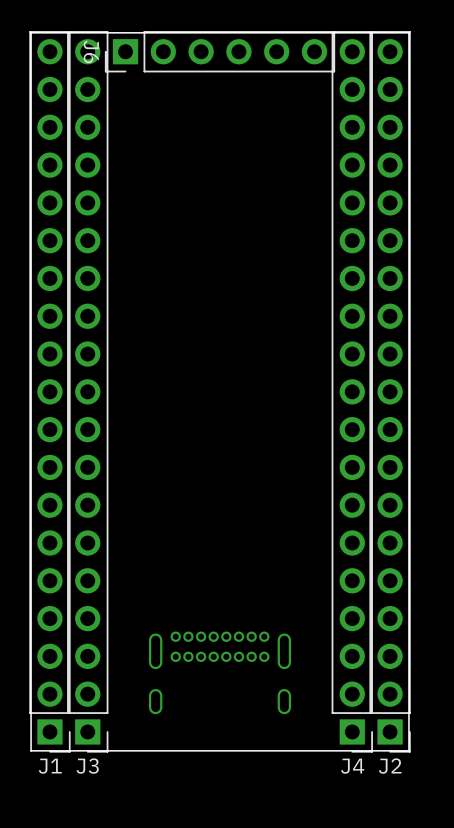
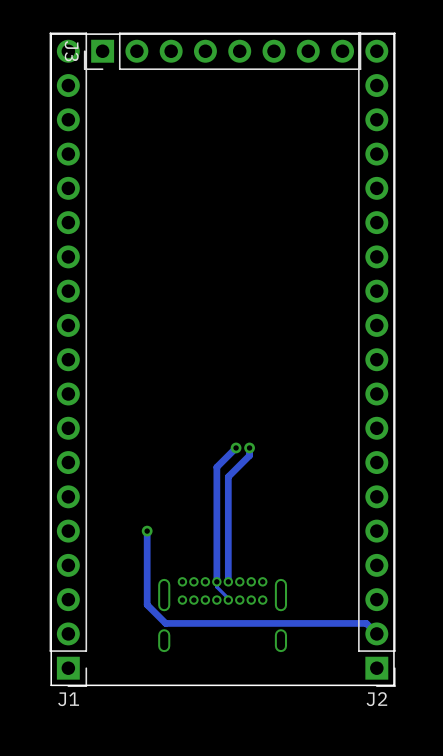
J3 footprint: [67, 31, 109, 753] -> [83, 32, 362, 71]
J6: (220, 51) -> none
J4: (352, 391) -> none
track: none -> (236, 447) (216, 467) (216, 587) (228, 600)
via: none -> (236, 447)
track: none -> (249, 447) (249, 455) (228, 476) (228, 581)
via: none -> (249, 447)
track: none -> (147, 531) (147, 604) (165, 623) (366, 623) (376, 633)
via: none -> (147, 531)
J3 name position: J3 (87, 766) -> J3 (71, 51)

